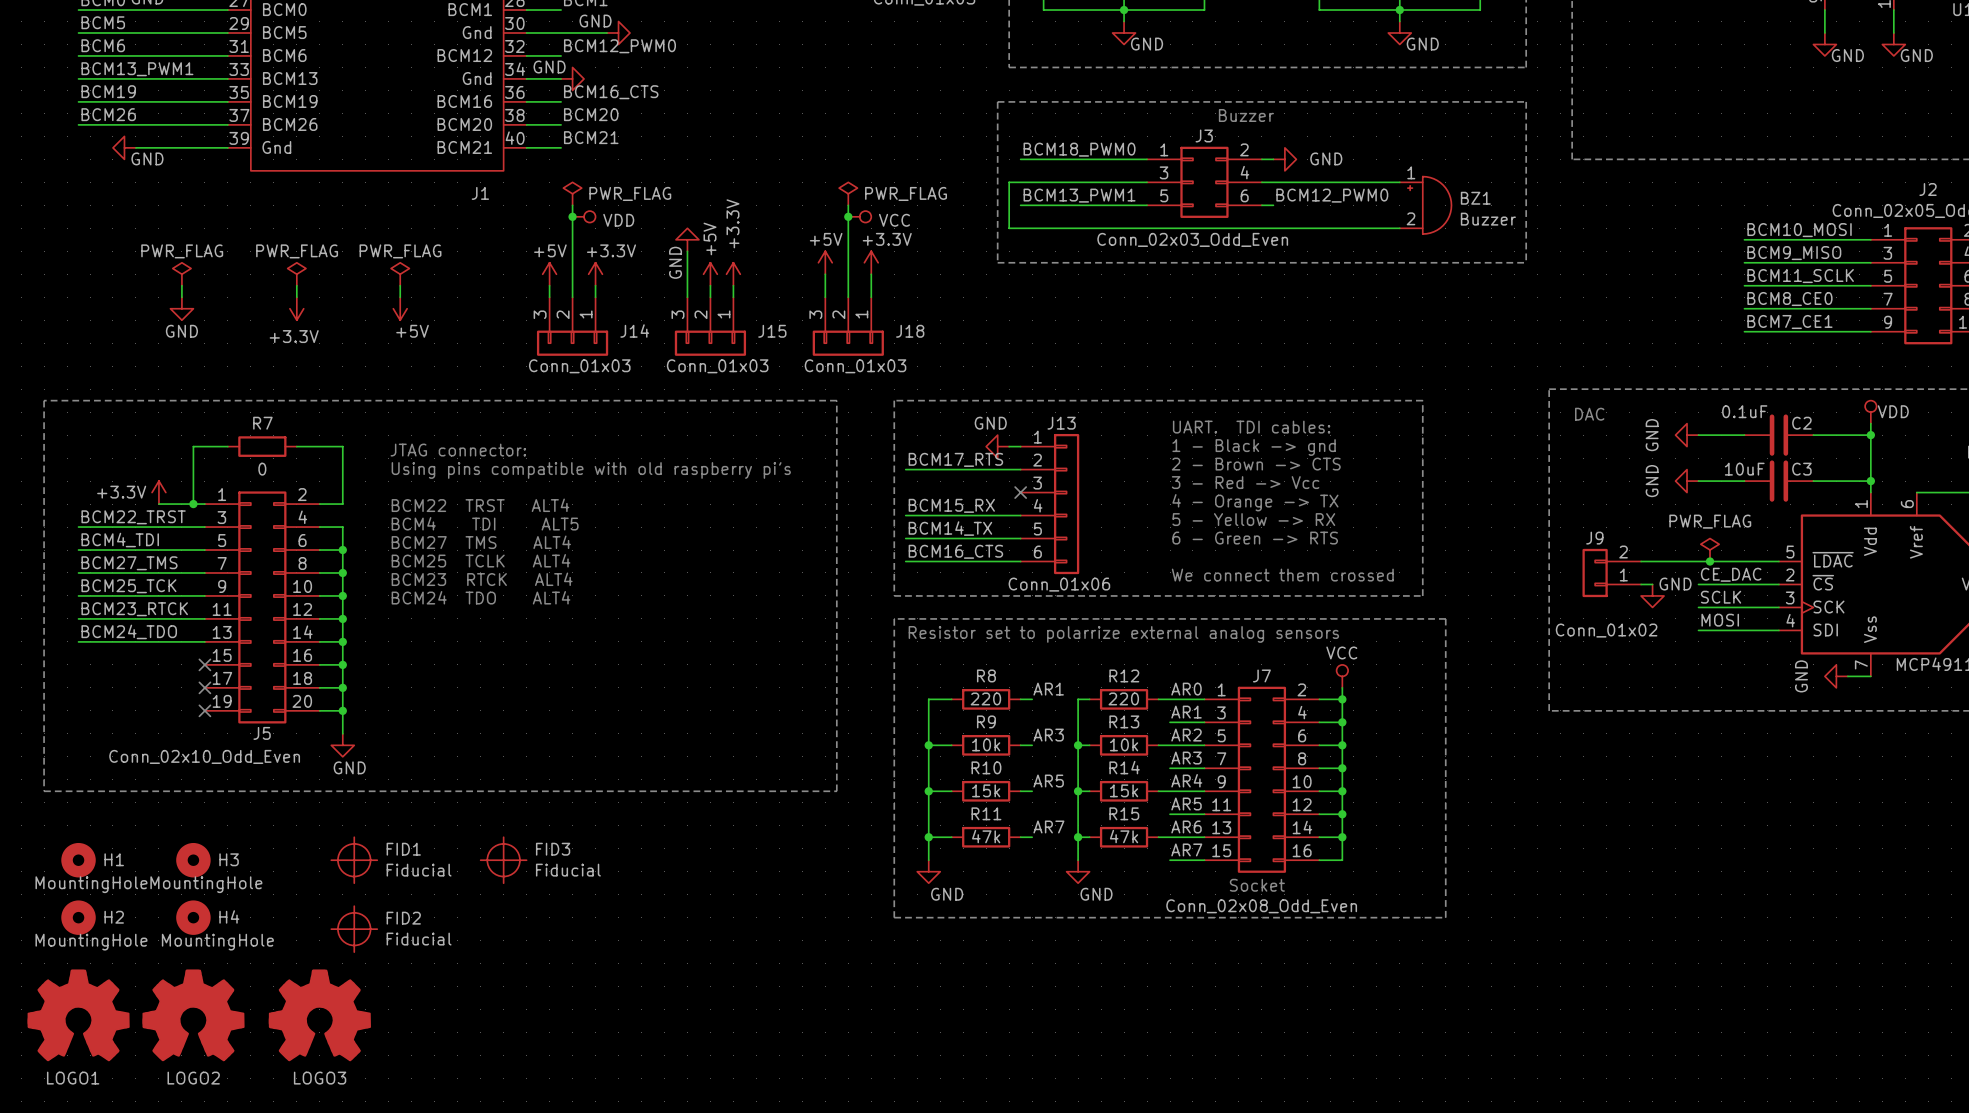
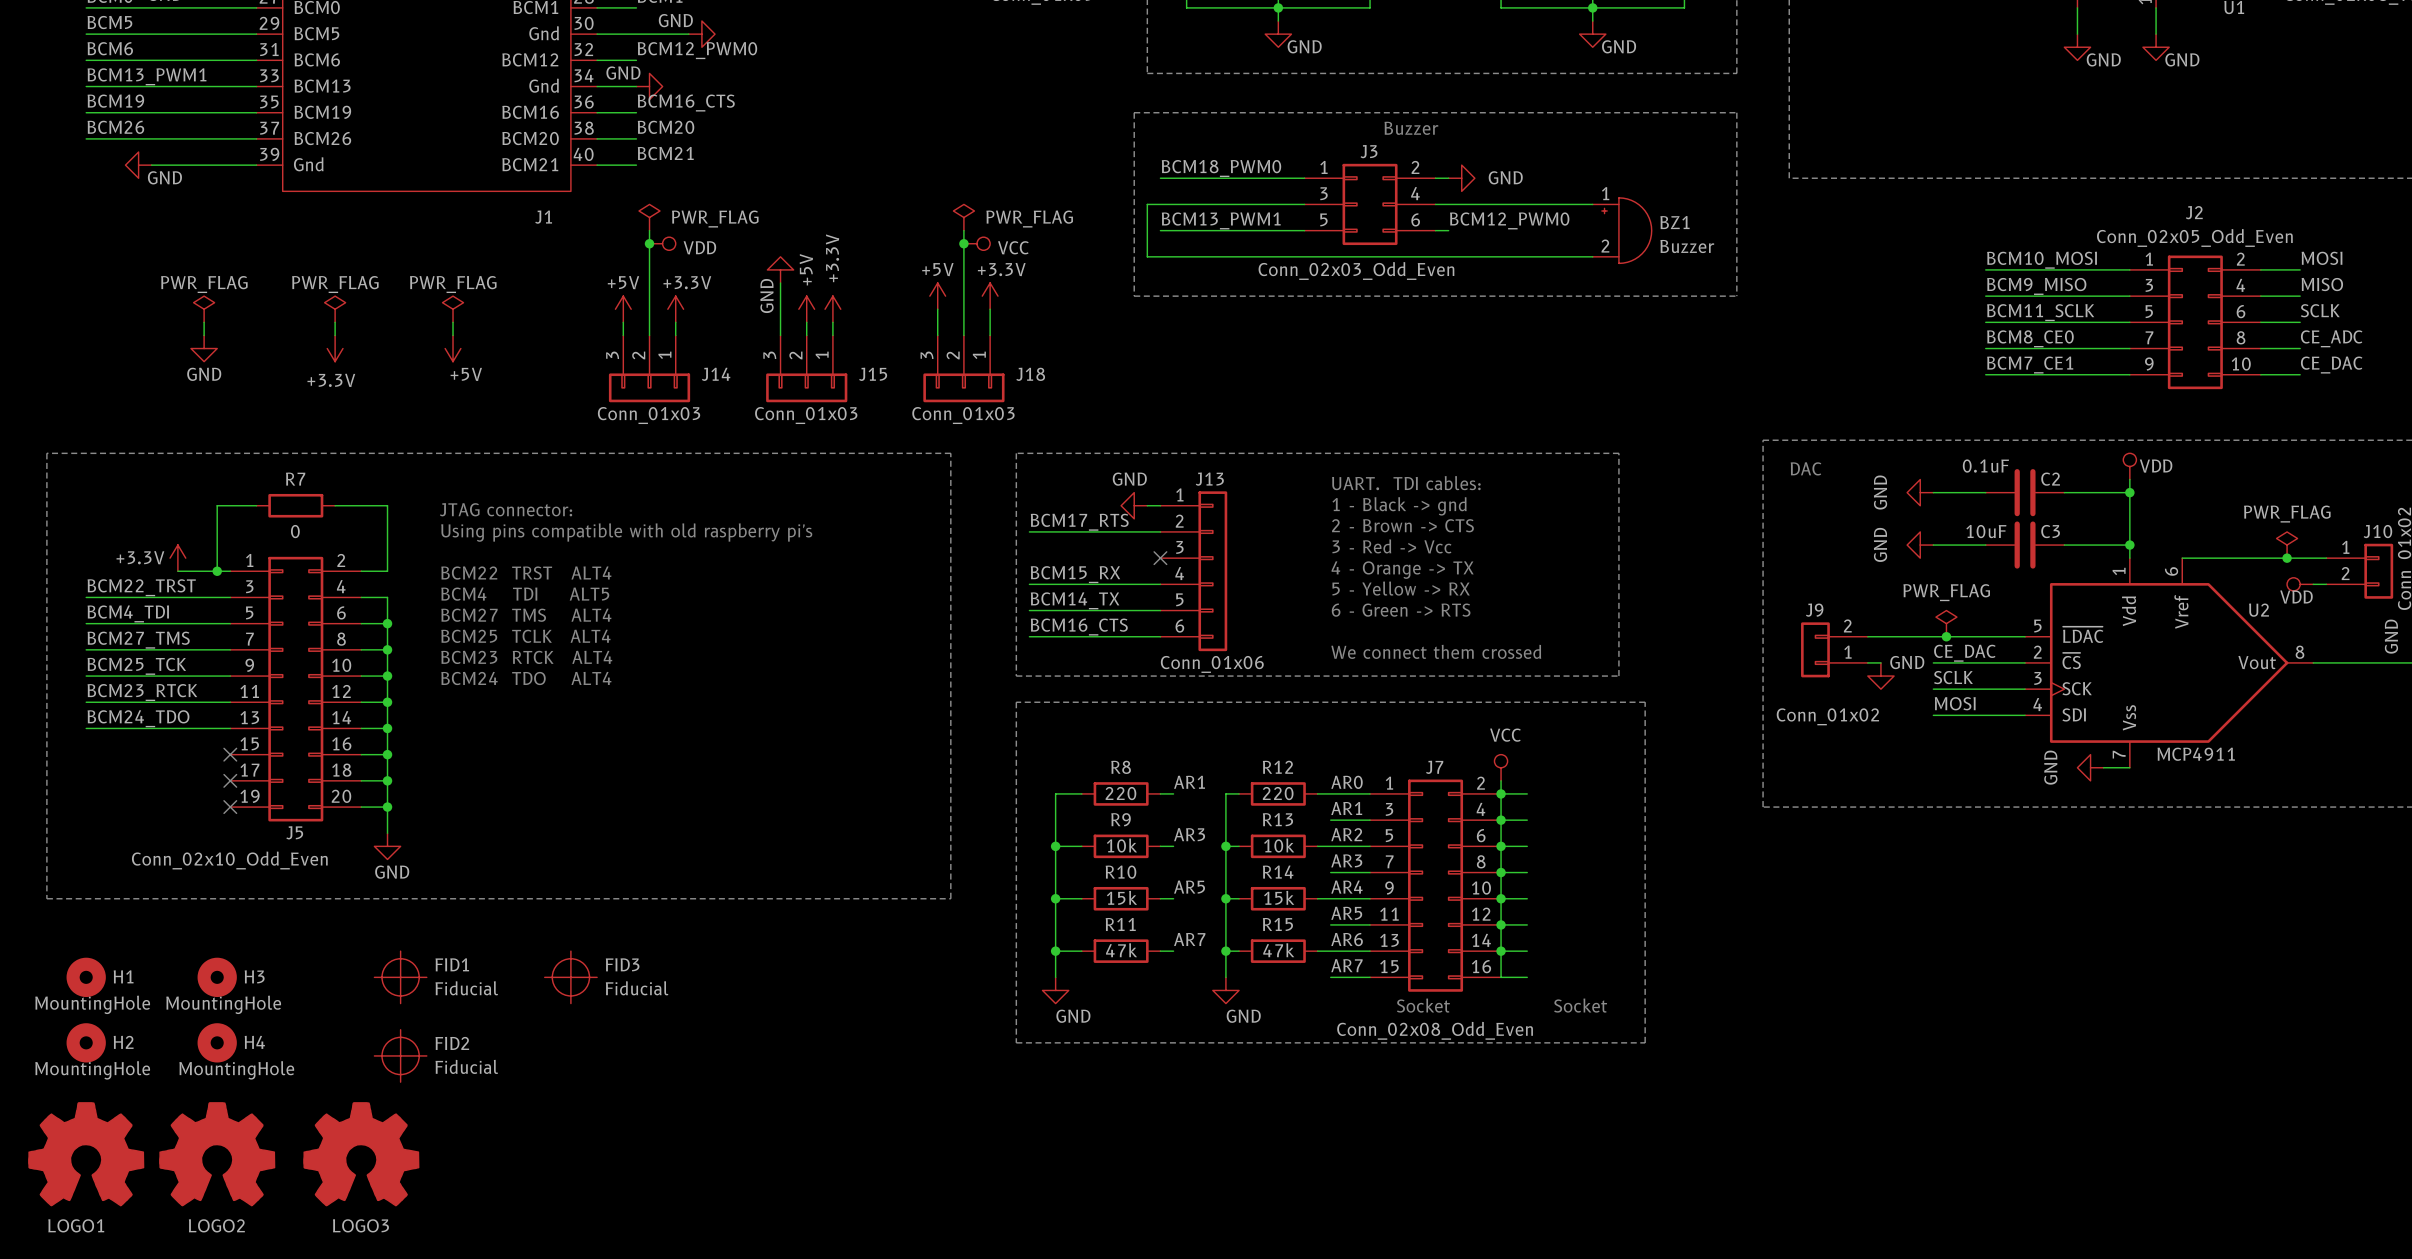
text: Resistor set to polarrize external analog sensors (1123, 634) -> none
power symbol text position: VCC (1341, 652) -> VCC (1505, 735)
power symbol position: VCC (1342, 676) -> VCC (1501, 767)
wire: (1342, 687) (1342, 860) -> (1501, 780) (1501, 977)
junction: none -> (1501, 793)
junction: (1342, 699) -> none
junction: none -> (1501, 820)
junction: (1342, 722) -> none
junction: none -> (1501, 846)
junction: (1342, 745) -> none
junction: none -> (1501, 872)
junction: (1342, 768) -> none
junction: none -> (1501, 898)
junction: (1342, 791) -> none
junction: none -> (1501, 924)
junction: (1342, 814) -> none
junction: none -> (1501, 951)
junction: (1342, 837) -> none
text: none -> Socket (1580, 1005)

